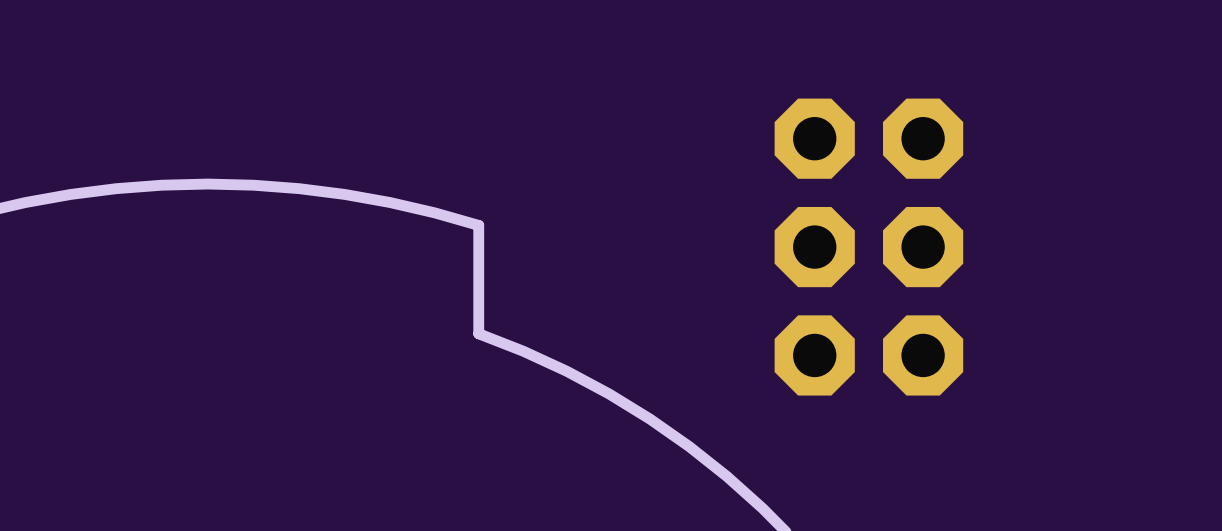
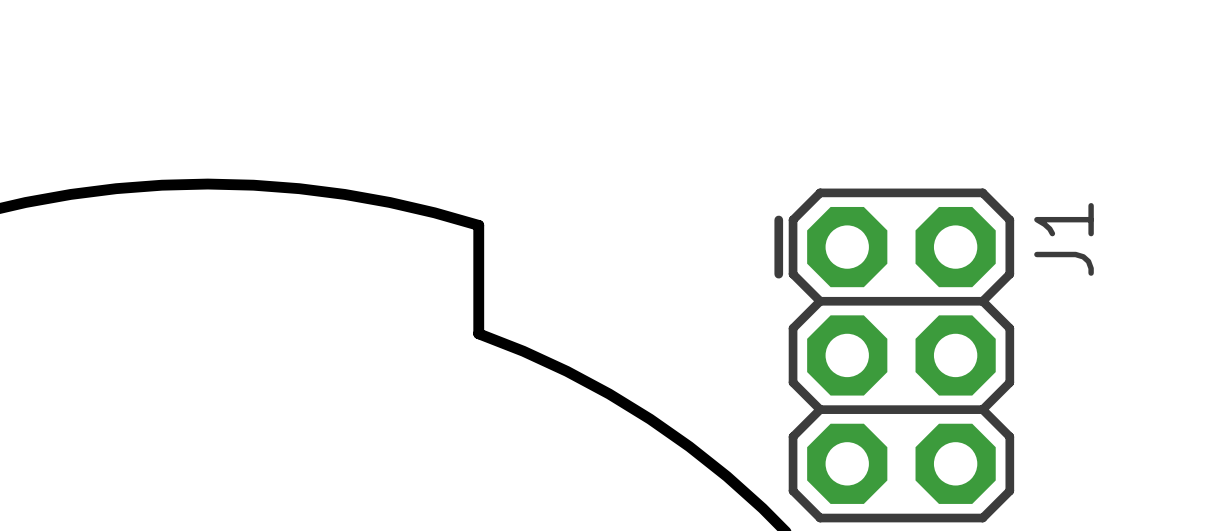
J1 side: top (868, 247) -> bottom (894, 355)

